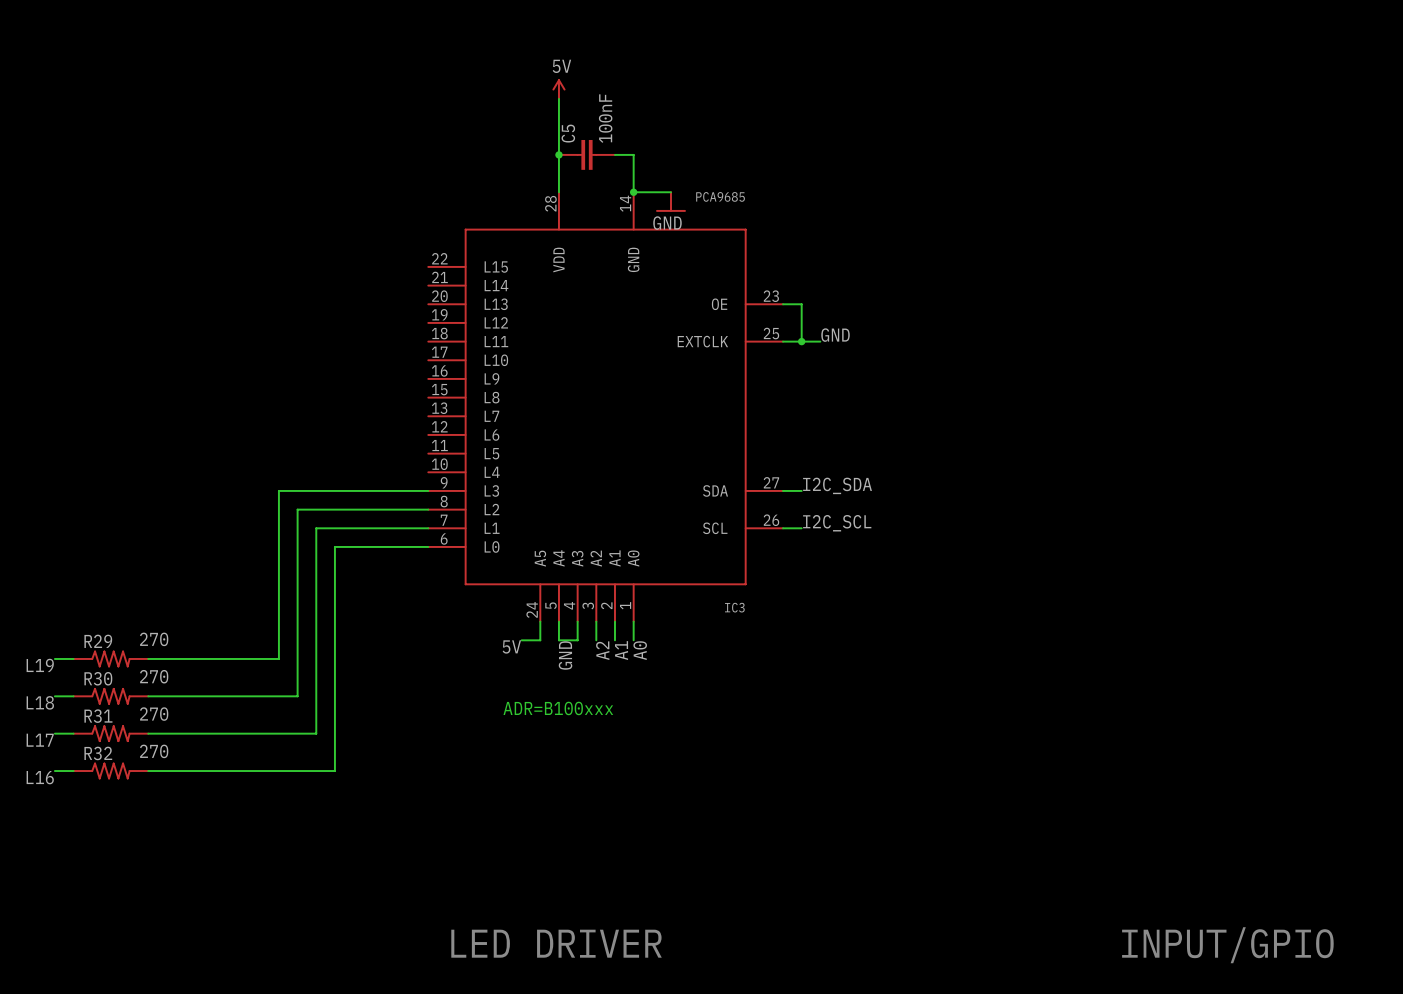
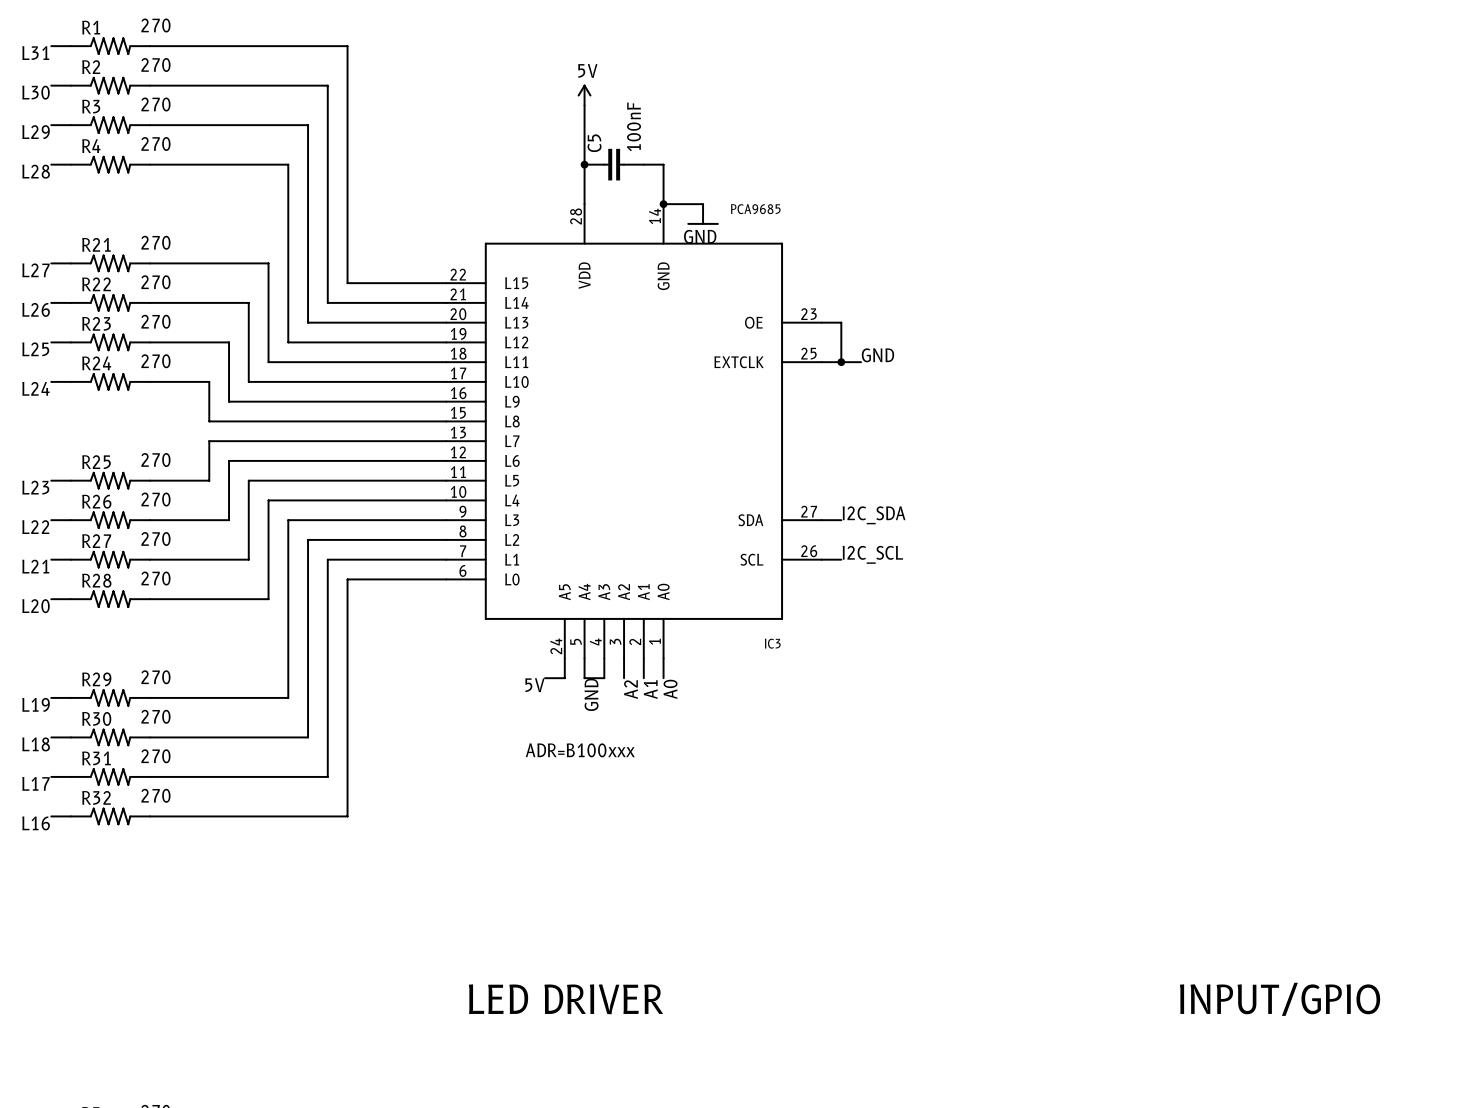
wire: none -> (51, 46) (71, 46)
R1: none -> 270 (110, 46)
wire: none -> (150, 46) (347, 46) (347, 283) (446, 283)
label: none -> L31 (35, 53)
wire: none -> (51, 85) (71, 85)
R2: none -> 270 (110, 85)
wire: none -> (150, 85) (327, 85) (327, 302) (446, 302)
label: none -> L30 (36, 92)
wire: none -> (51, 125) (71, 125)
R3: none -> 270 (110, 125)
wire: none -> (150, 125) (308, 125) (308, 322) (446, 322)
label: none -> L29 (36, 132)
wire: none -> (51, 164) (71, 164)
R4: none -> 270 (110, 164)
wire: none -> (150, 164) (288, 164) (288, 342) (446, 342)
label: none -> L28 (36, 171)
wire: none -> (51, 263) (71, 263)
R21: none -> 270 (110, 263)
wire: none -> (150, 263) (268, 263) (268, 362) (446, 362)
label: none -> L27 (35, 270)
wire: none -> (51, 302) (71, 302)
R22: none -> 270 (110, 302)
wire: none -> (150, 302) (248, 302) (248, 381) (446, 381)
label: none -> L26 (36, 309)
wire: none -> (51, 342) (71, 342)
R23: none -> 270 (110, 342)
wire: none -> (150, 342) (229, 342) (229, 401) (446, 401)
label: none -> L25 (35, 349)
wire: none -> (51, 381) (71, 381)
R24: none -> 270 (110, 381)
wire: none -> (150, 381) (209, 381) (209, 421) (446, 421)
label: none -> L24 (35, 388)
wire: none -> (446, 441) (209, 441) (209, 480) (150, 480)
wire: none -> (446, 460) (229, 460) (229, 520) (150, 520)
wire: none -> (51, 480) (71, 480)
R25: none -> 270 (110, 480)
wire: none -> (446, 480) (248, 480) (248, 559) (150, 559)
label: none -> L23 (35, 487)
wire: none -> (446, 500) (268, 500) (268, 599) (150, 599)
wire: none -> (51, 520) (71, 520)
R26: none -> 270 (110, 520)
label: none -> L22 (35, 527)
wire: none -> (51, 559) (71, 559)
R27: none -> 270 (110, 559)
label: none -> L21 (35, 566)
wire: none -> (51, 599) (71, 599)
R28: none -> 270 (110, 599)
label: none -> L20 (36, 606)

